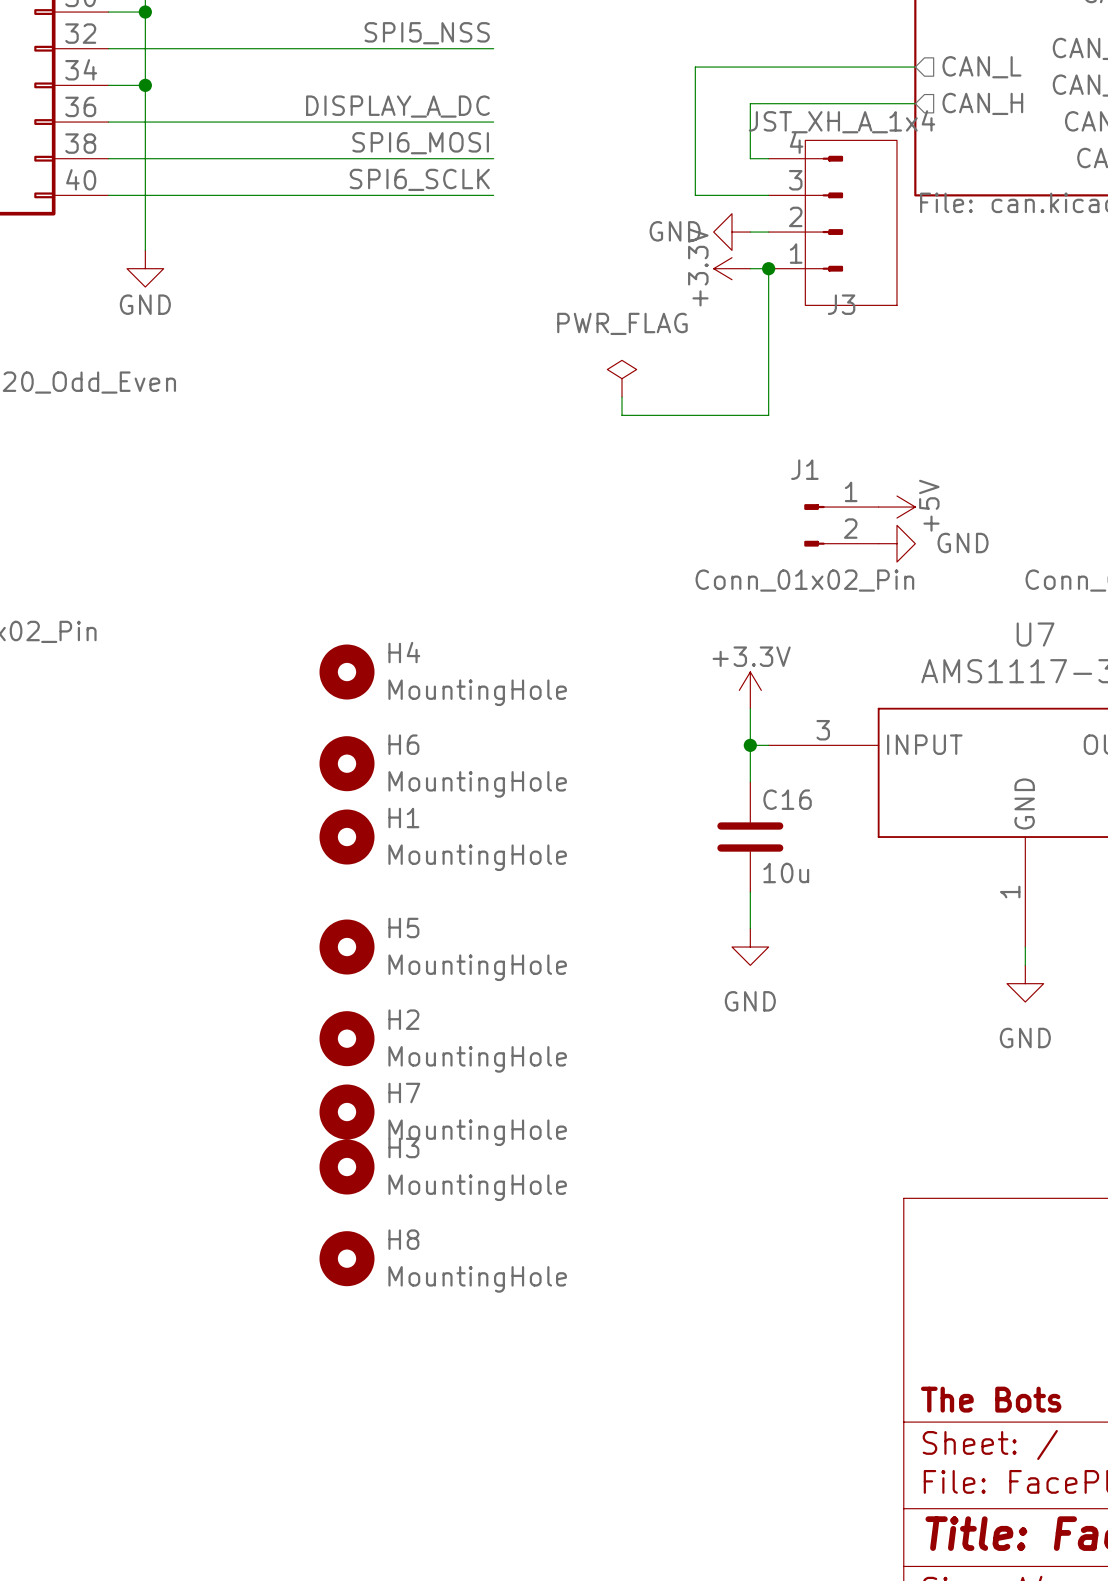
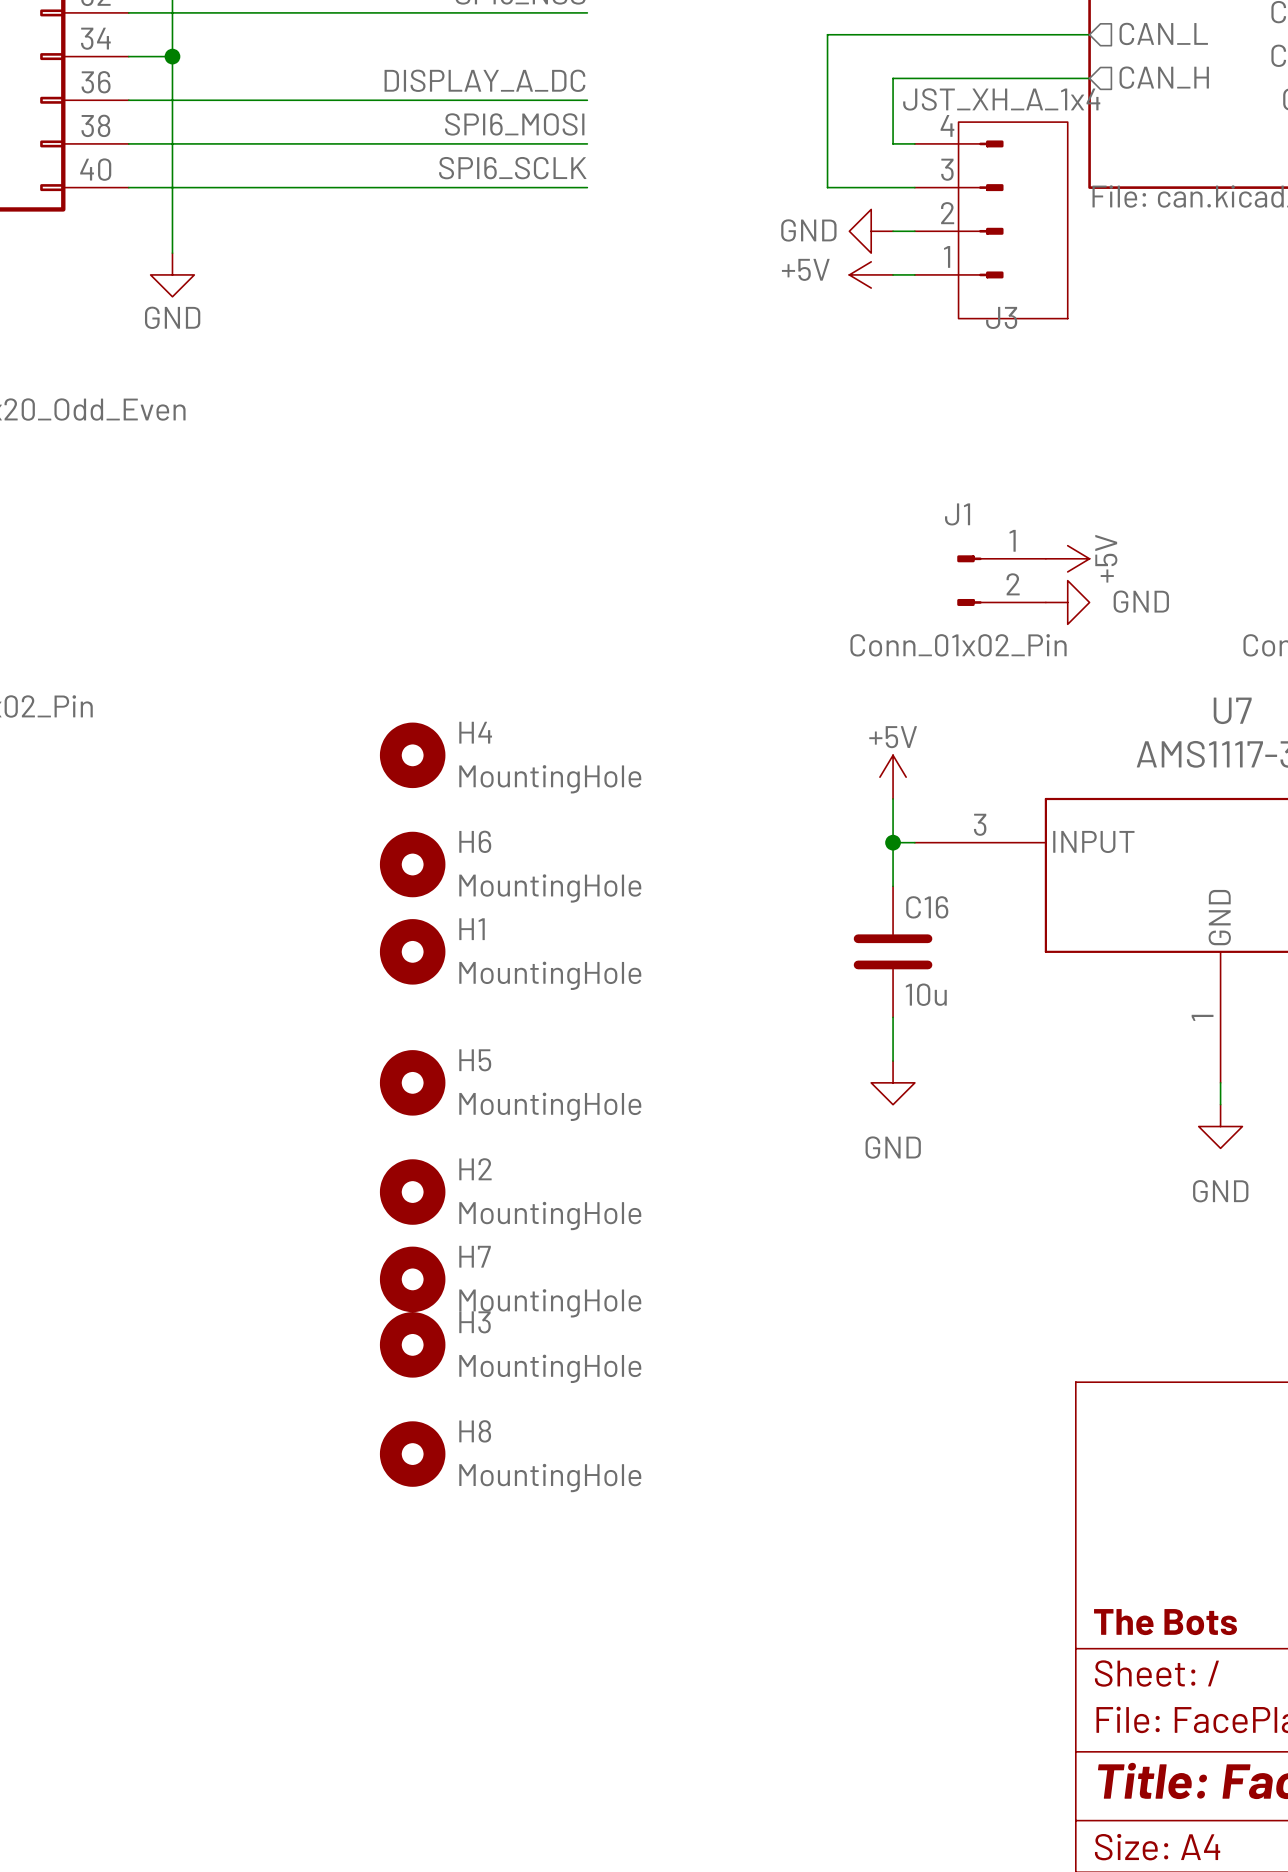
power symbol: +3.3V (731, 268) -> +5V (871, 274)
wire: (768, 268) (768, 415) (622, 415) (622, 397) -> none
junction: (768, 268) -> none
power symbol: PWR_FLAG (622, 378) -> none
power symbol: +3.3V (750, 690) -> +5V (893, 777)

